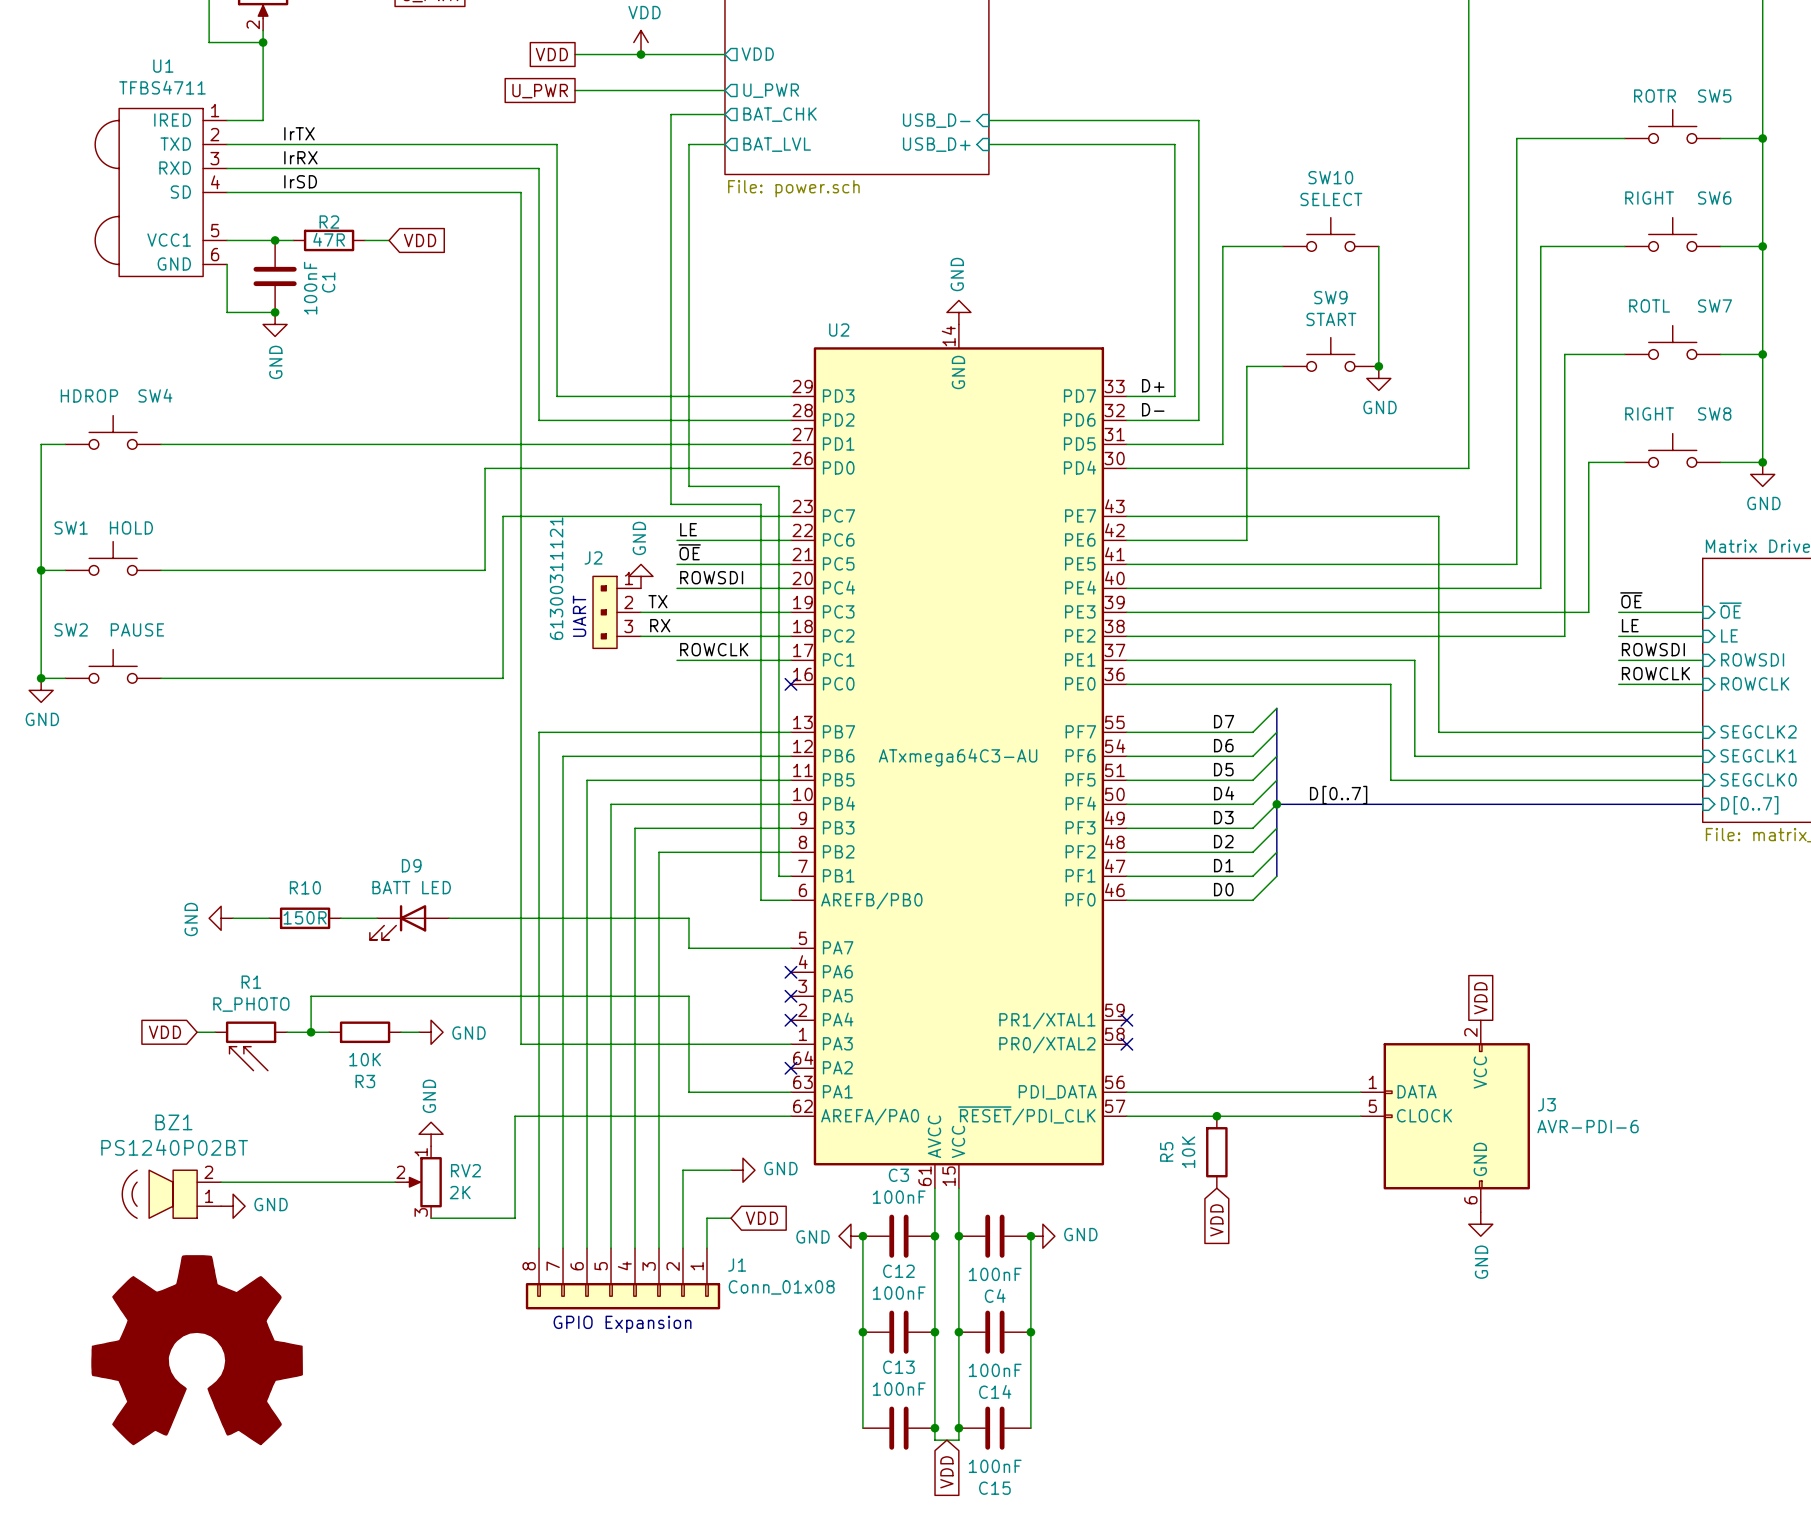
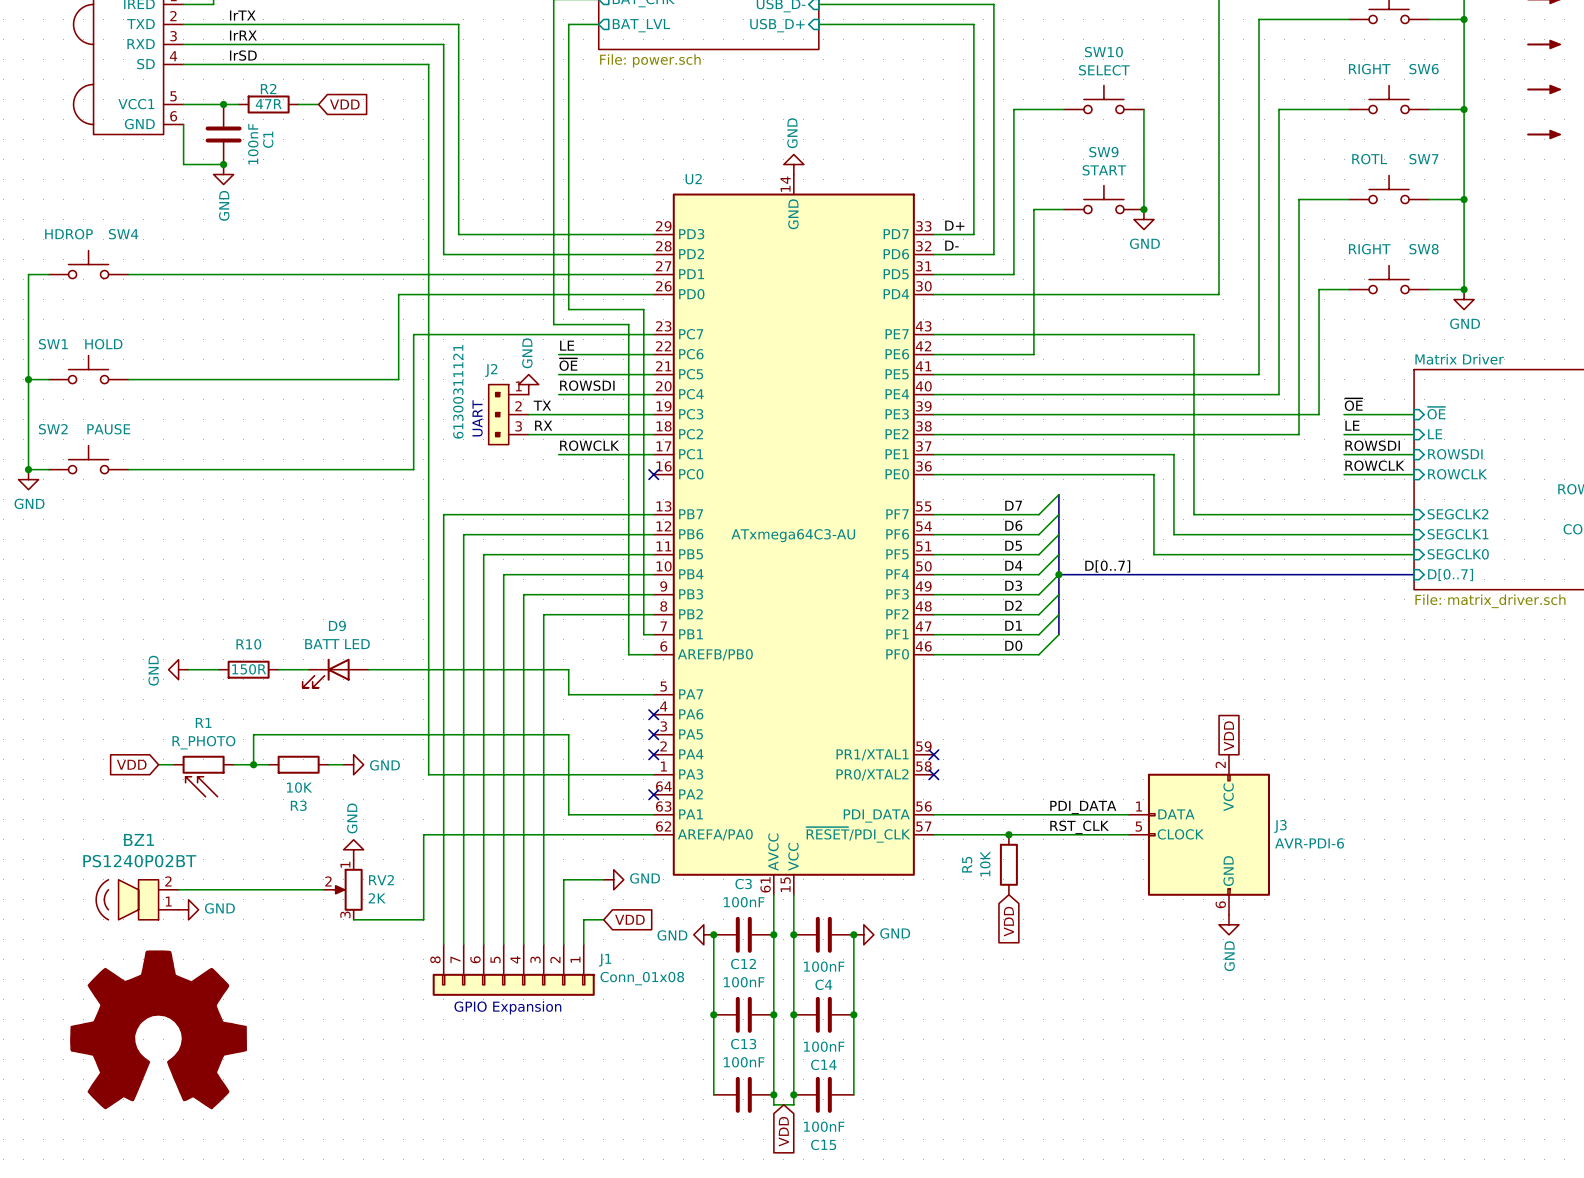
label: none -> PDI_DATA (1083, 807)
label: none -> RST_CLK (1079, 827)

